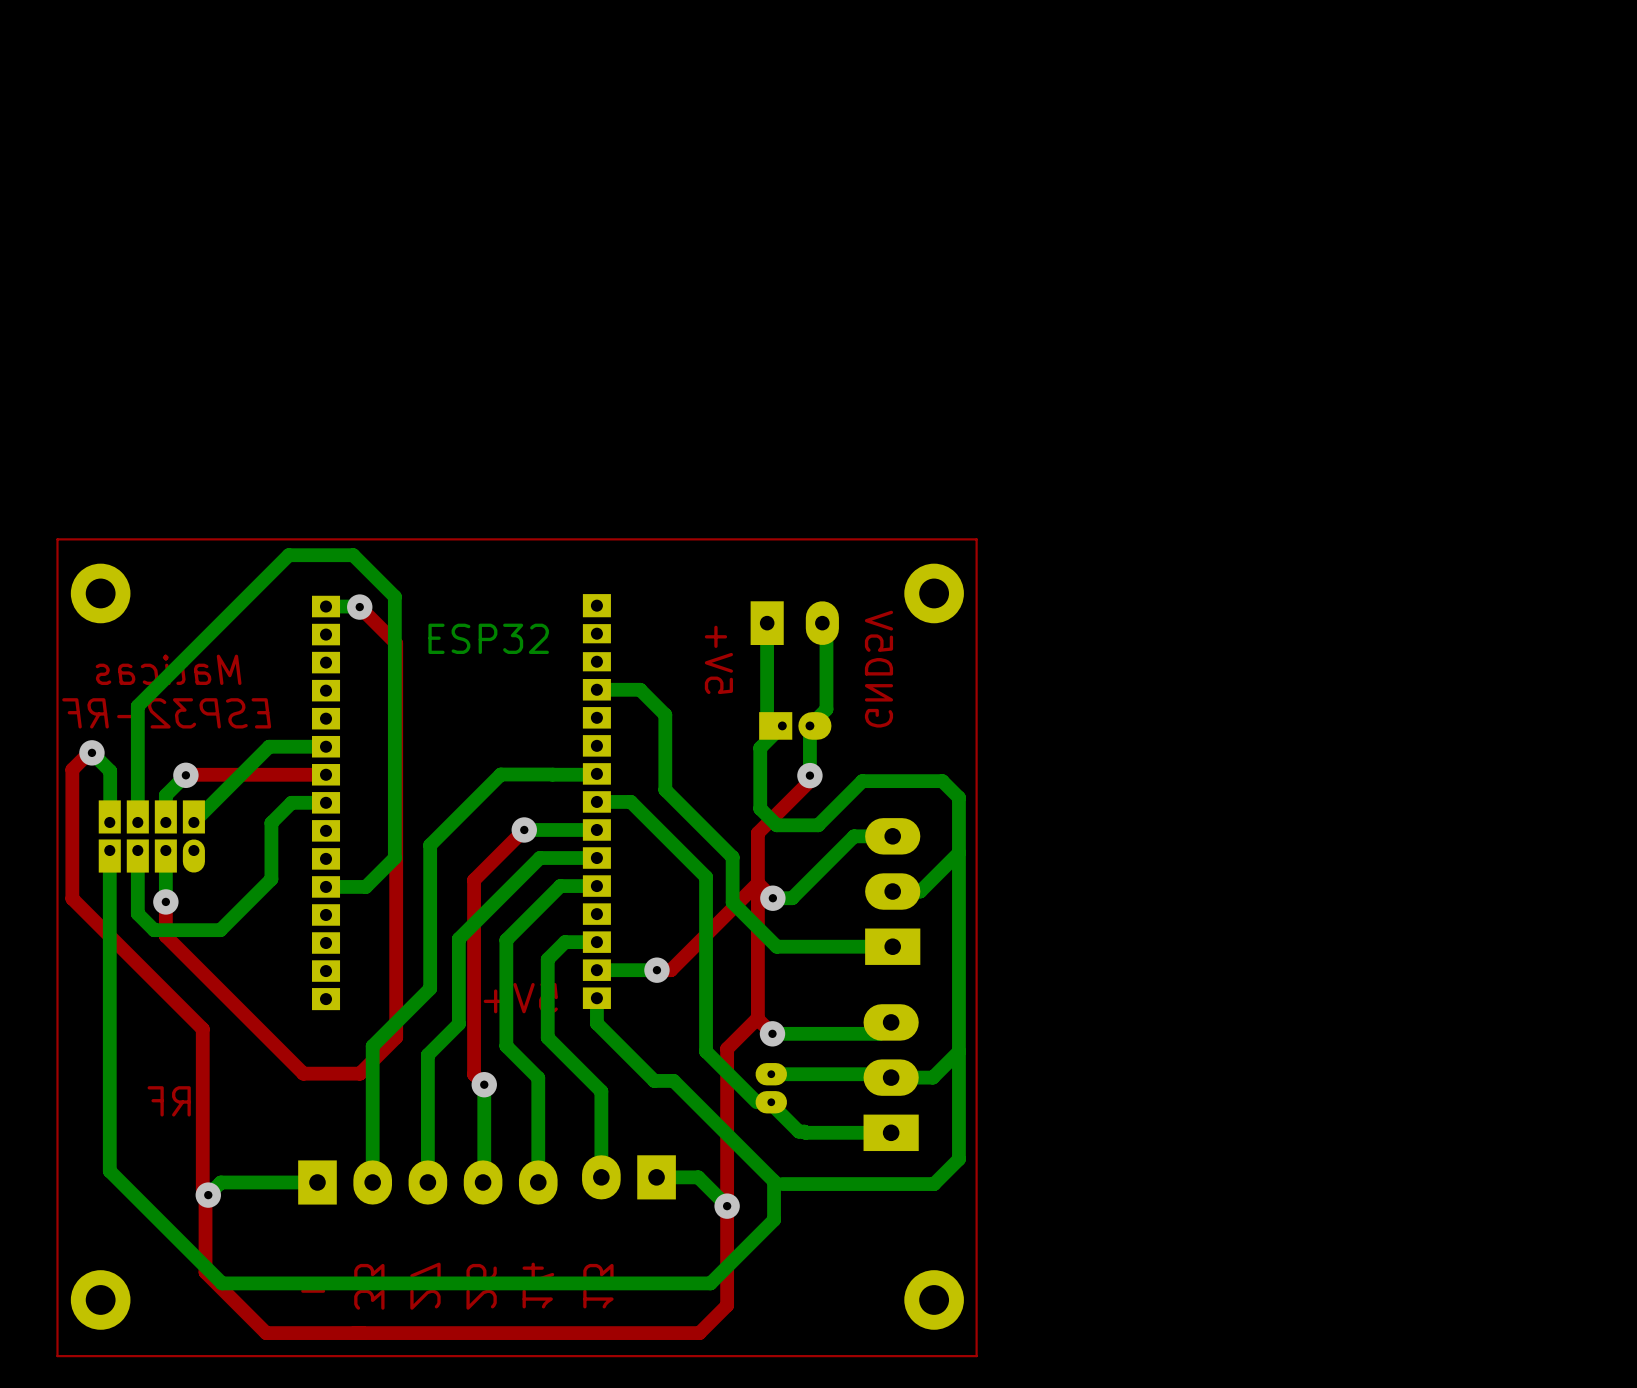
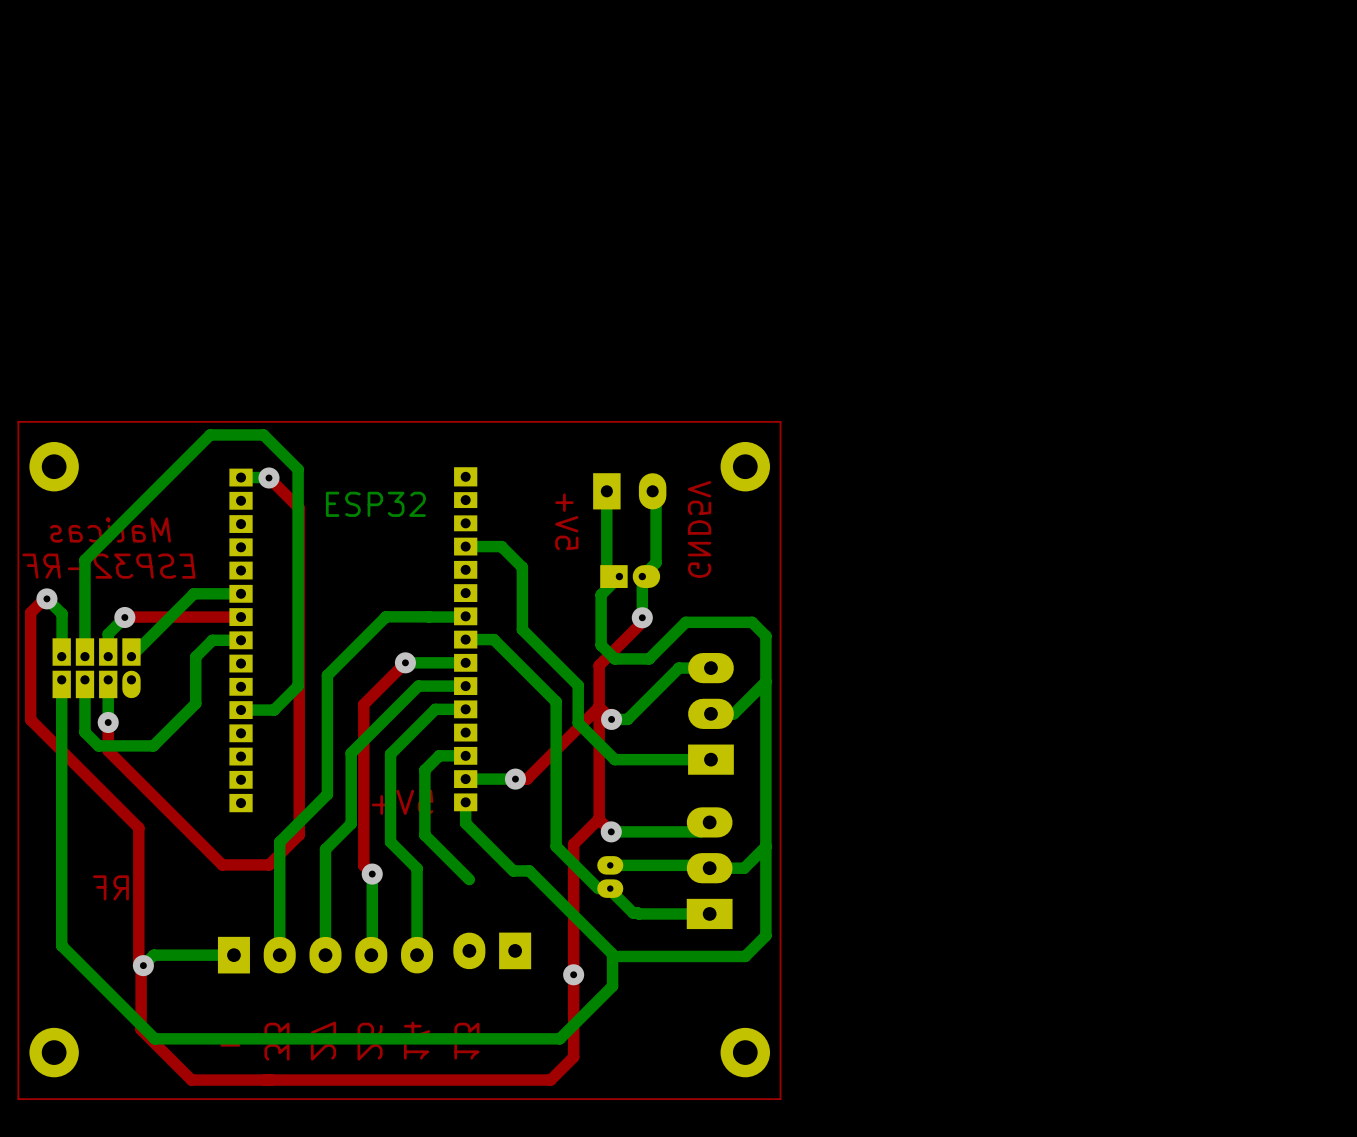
bottom track: (601, 1091) (601, 1177) -> none
bottom track: (656, 1177) (698, 1177) (727, 1206) -> none

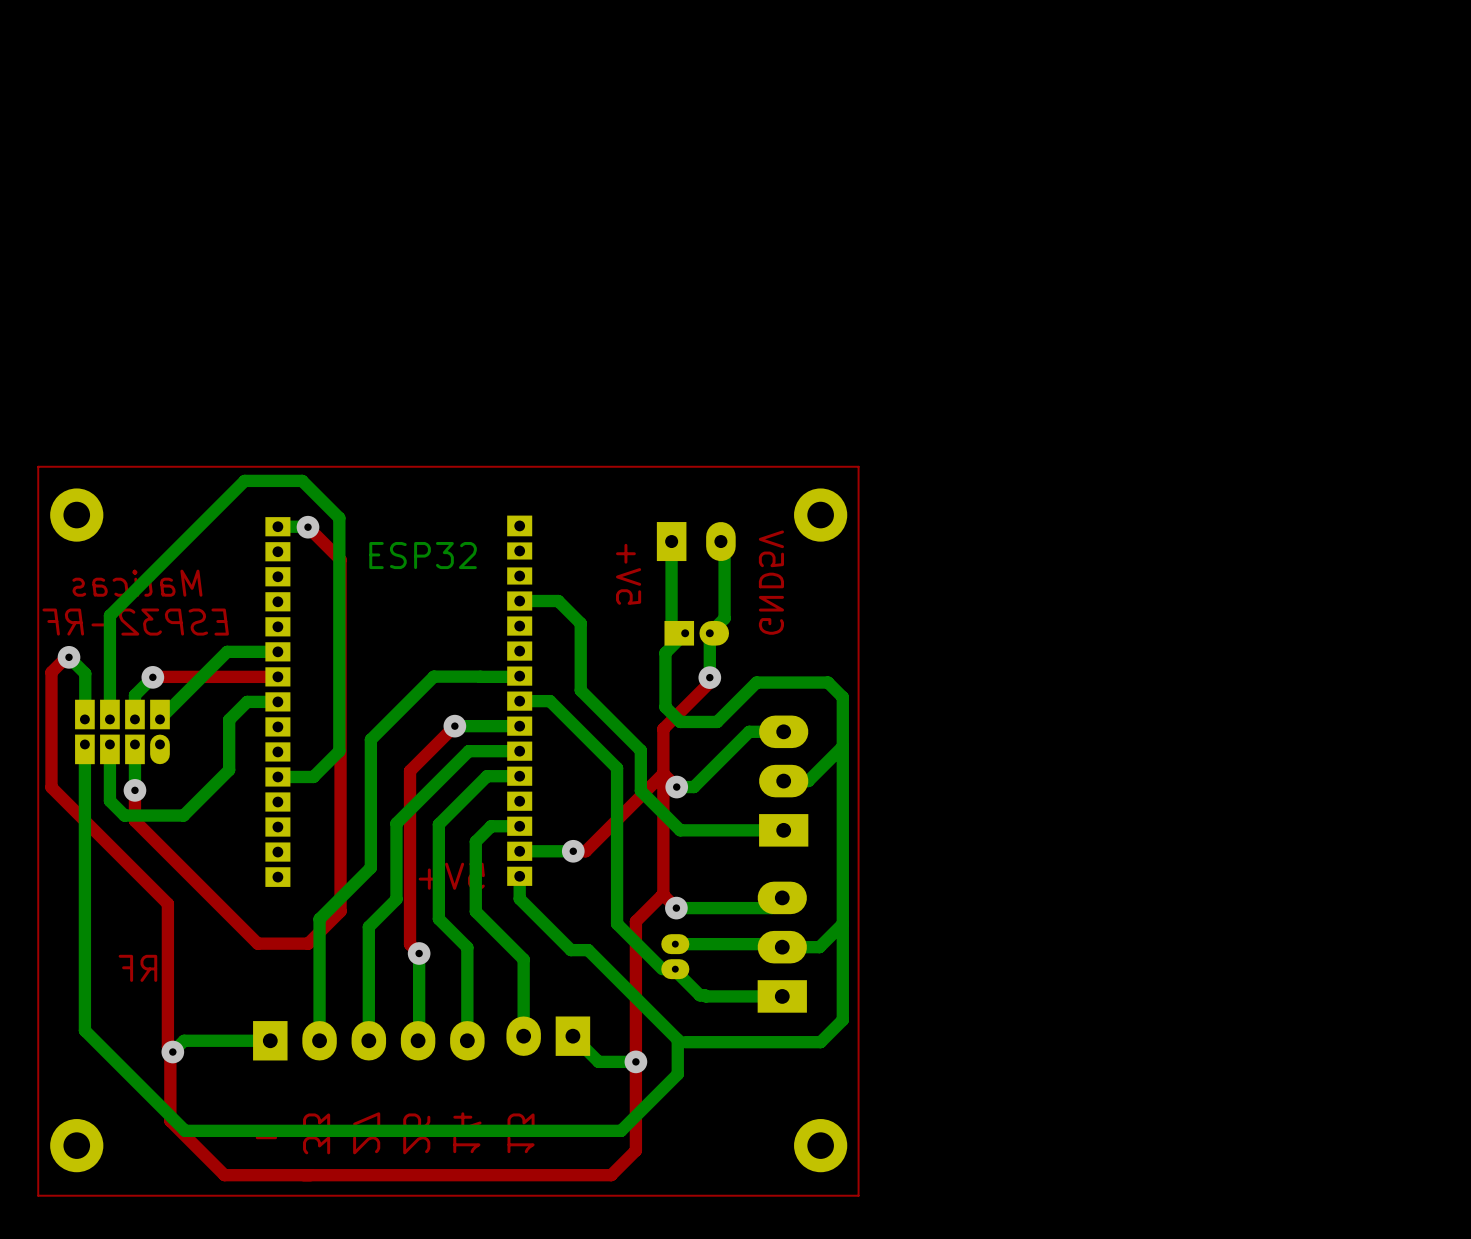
bottom track: none -> (523, 959) (523, 1036)
bottom track: none -> (572, 1036) (598, 1061) (635, 1061)

